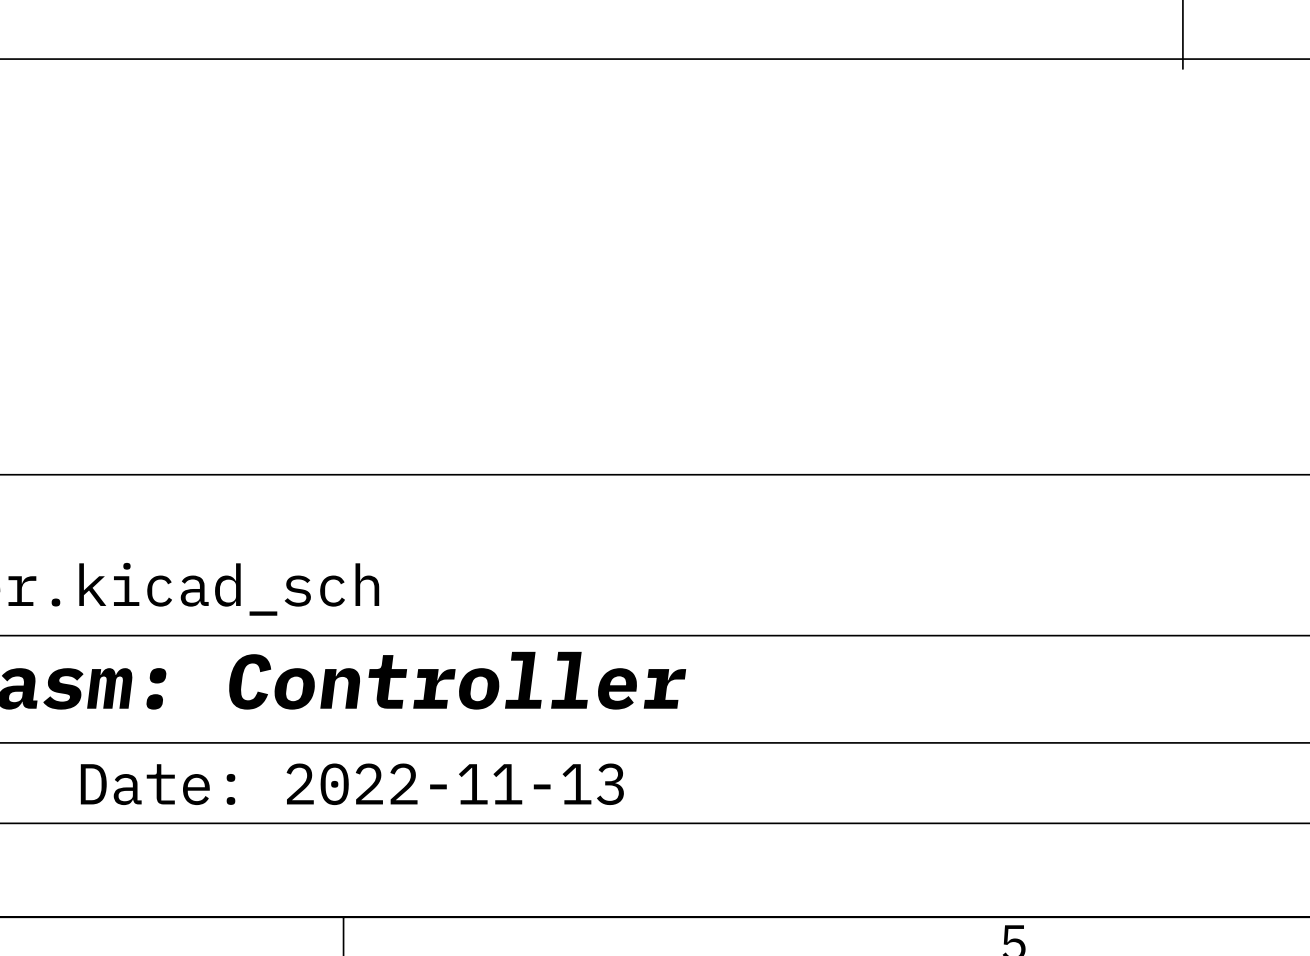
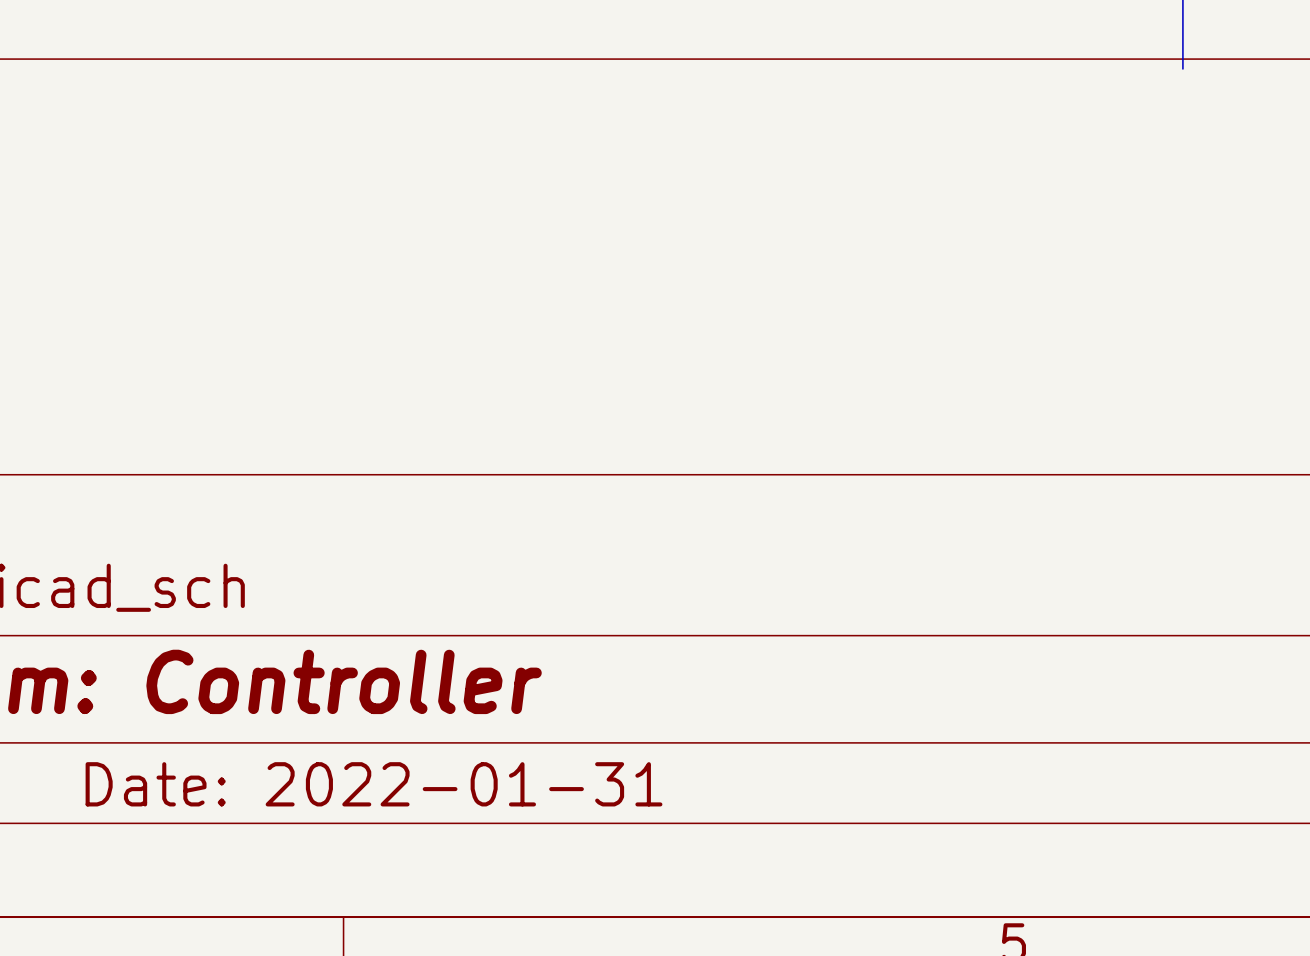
title block: Date: 2022-11-13 (352, 784) -> Date: 2022-01-31 (374, 784)

